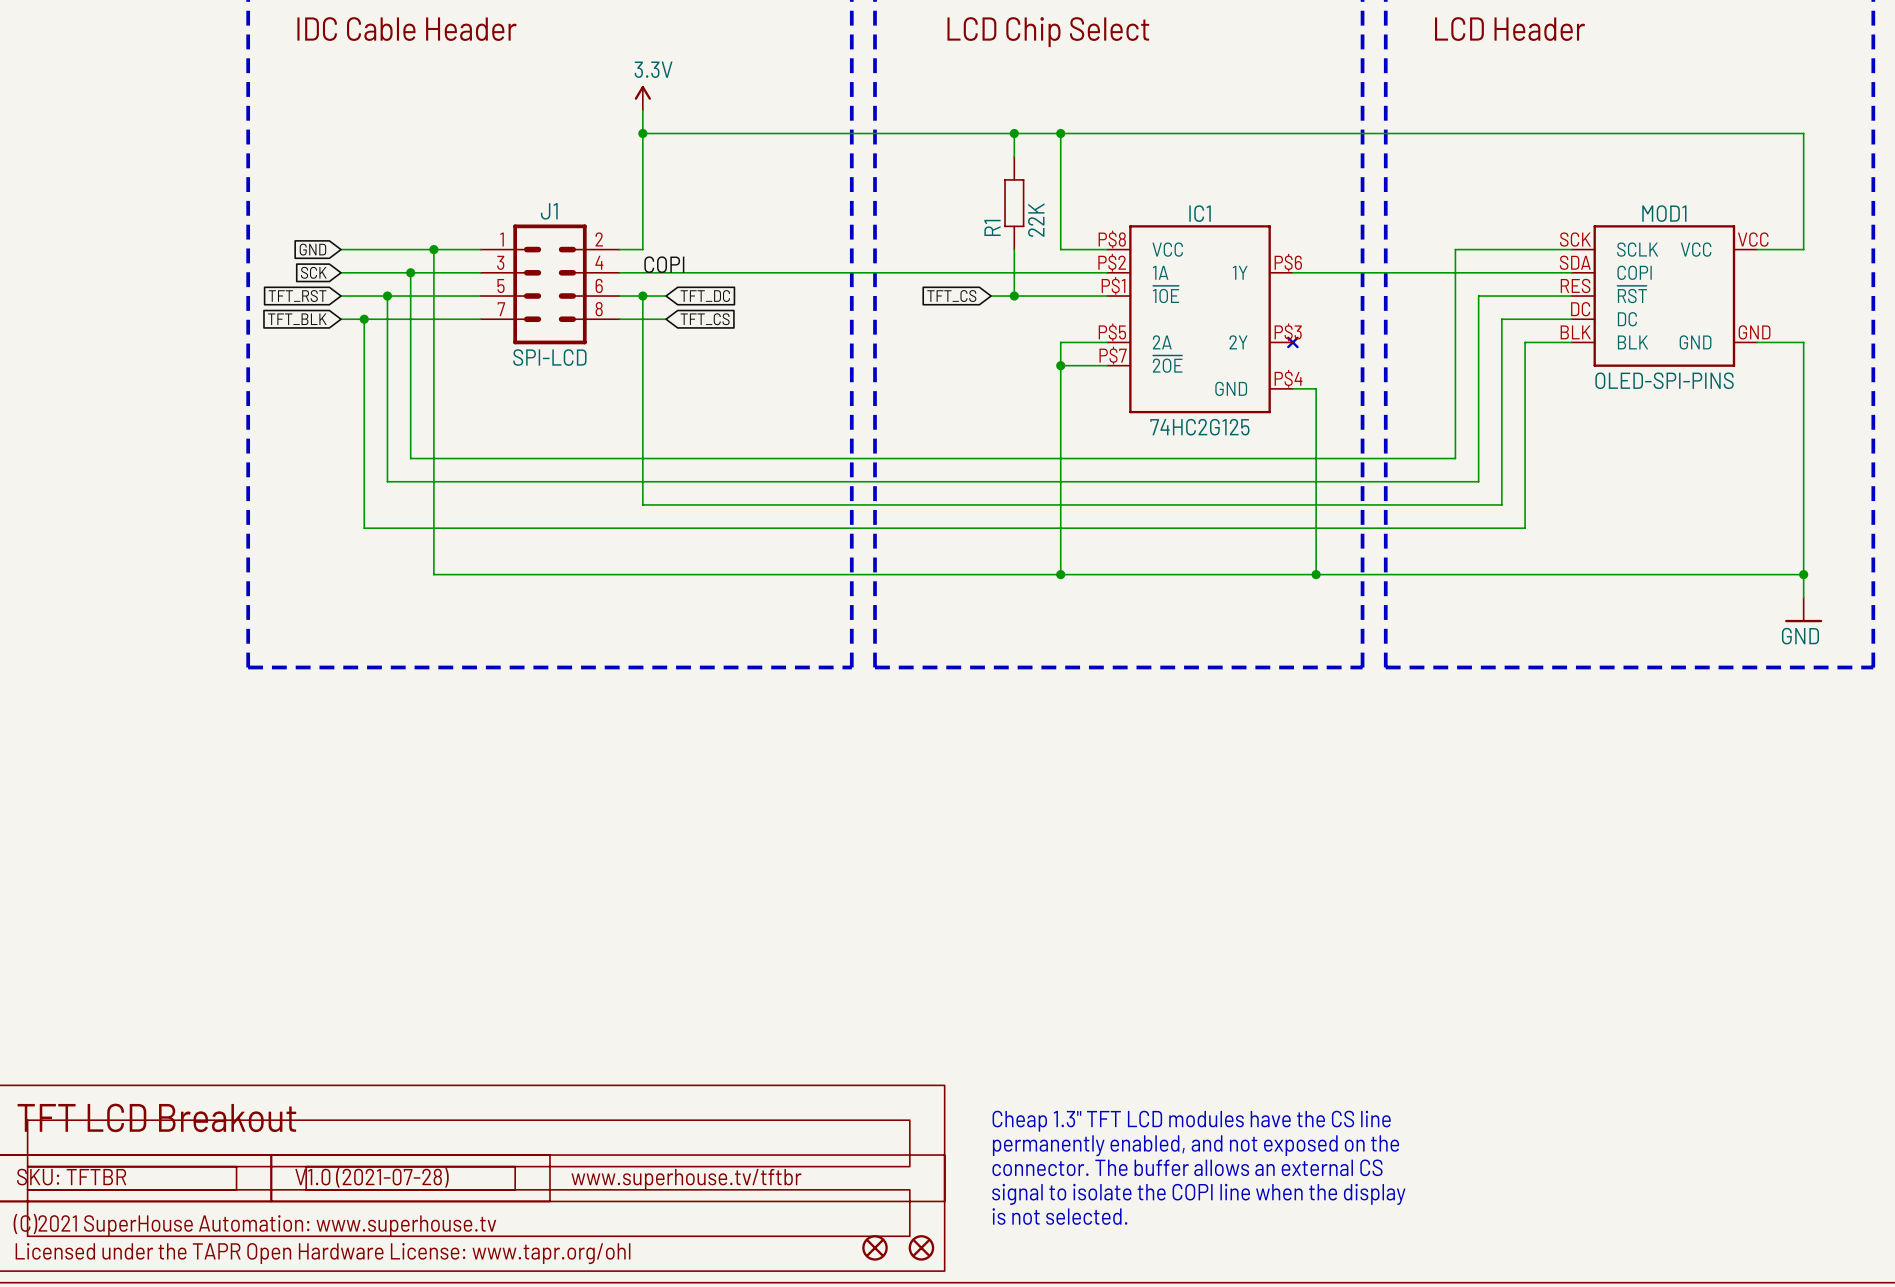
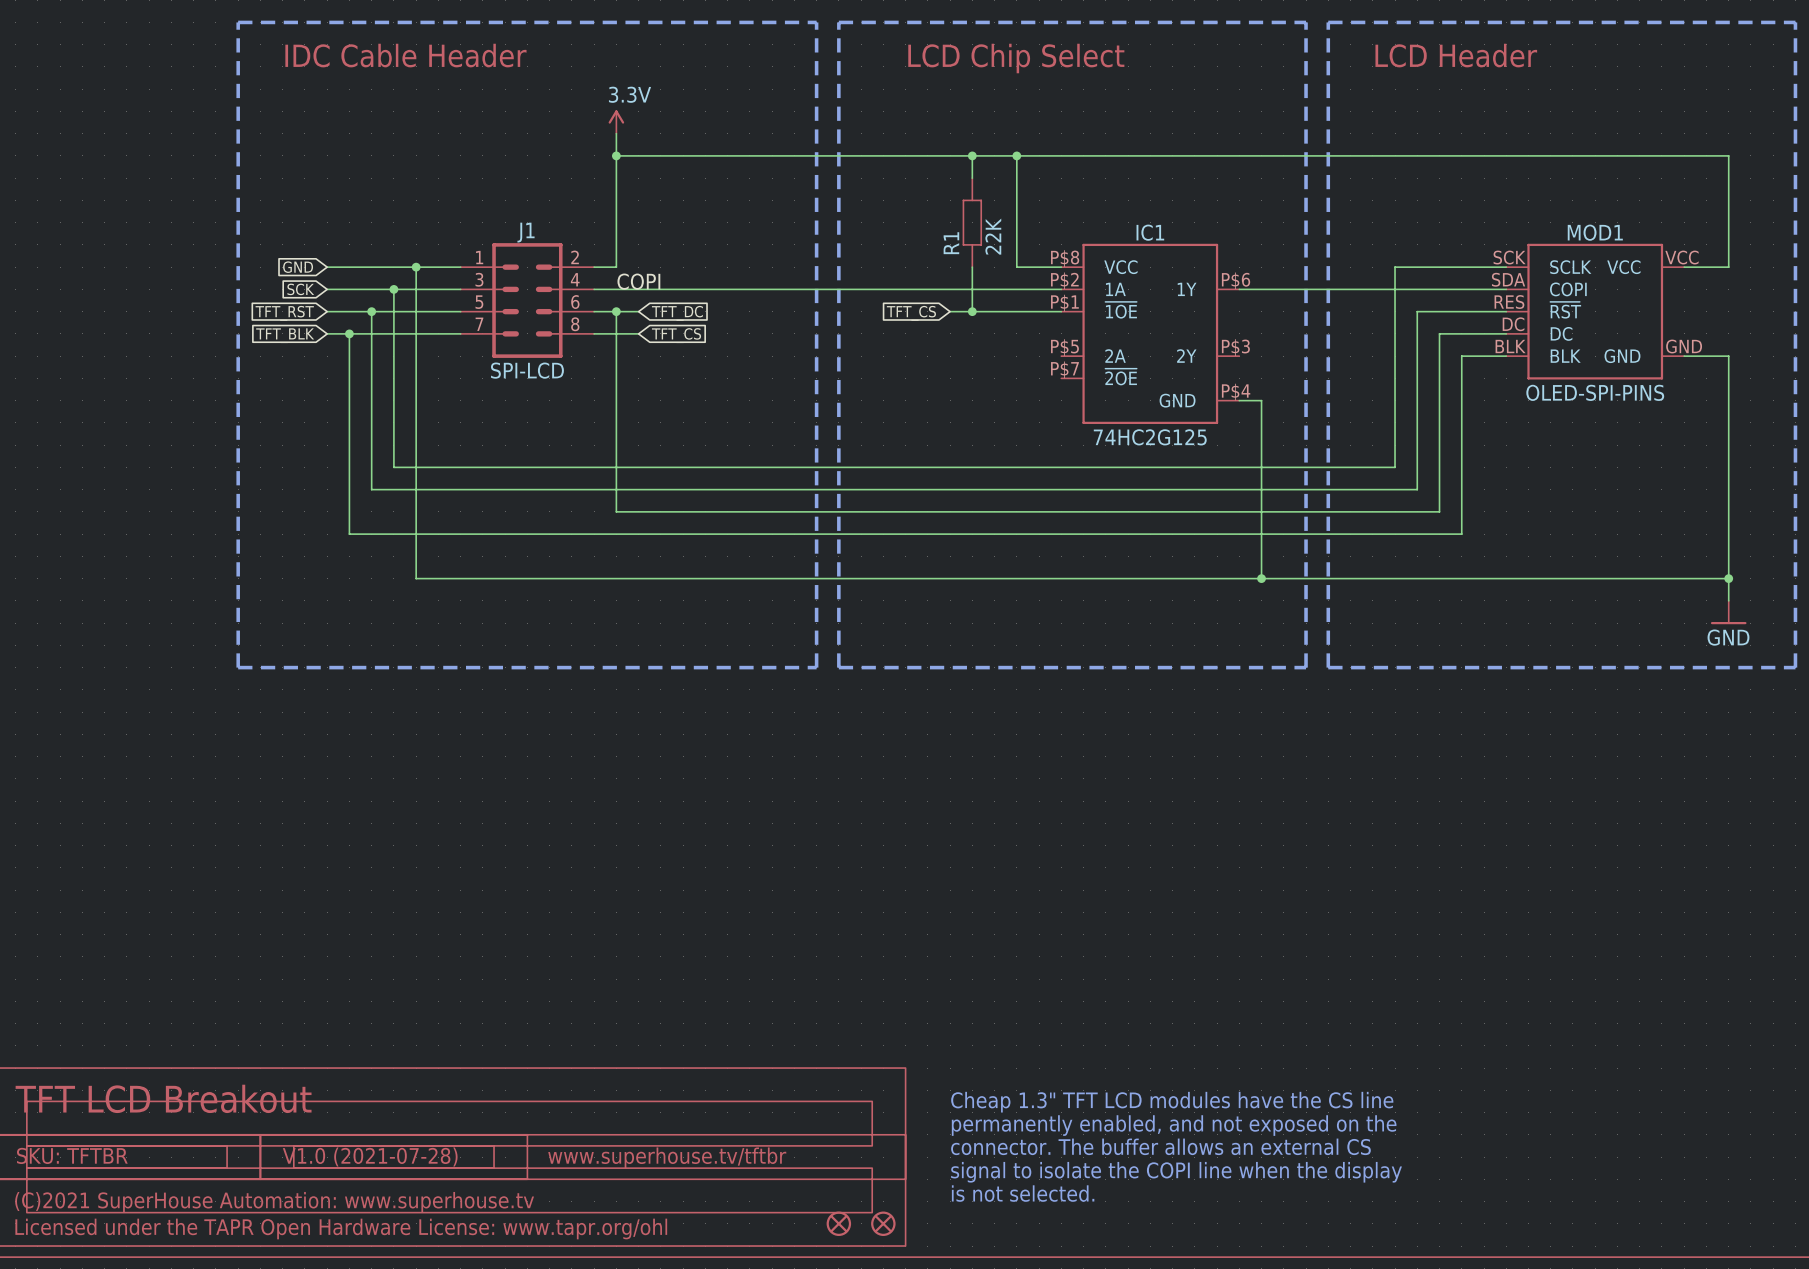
wire: (1107, 342) (1060, 342) (1060, 574) -> none
part: (1292, 342) -> none
wire: (1060, 365) (1107, 365) -> none
junction: (1060, 365) -> none
junction: (1060, 574) -> none

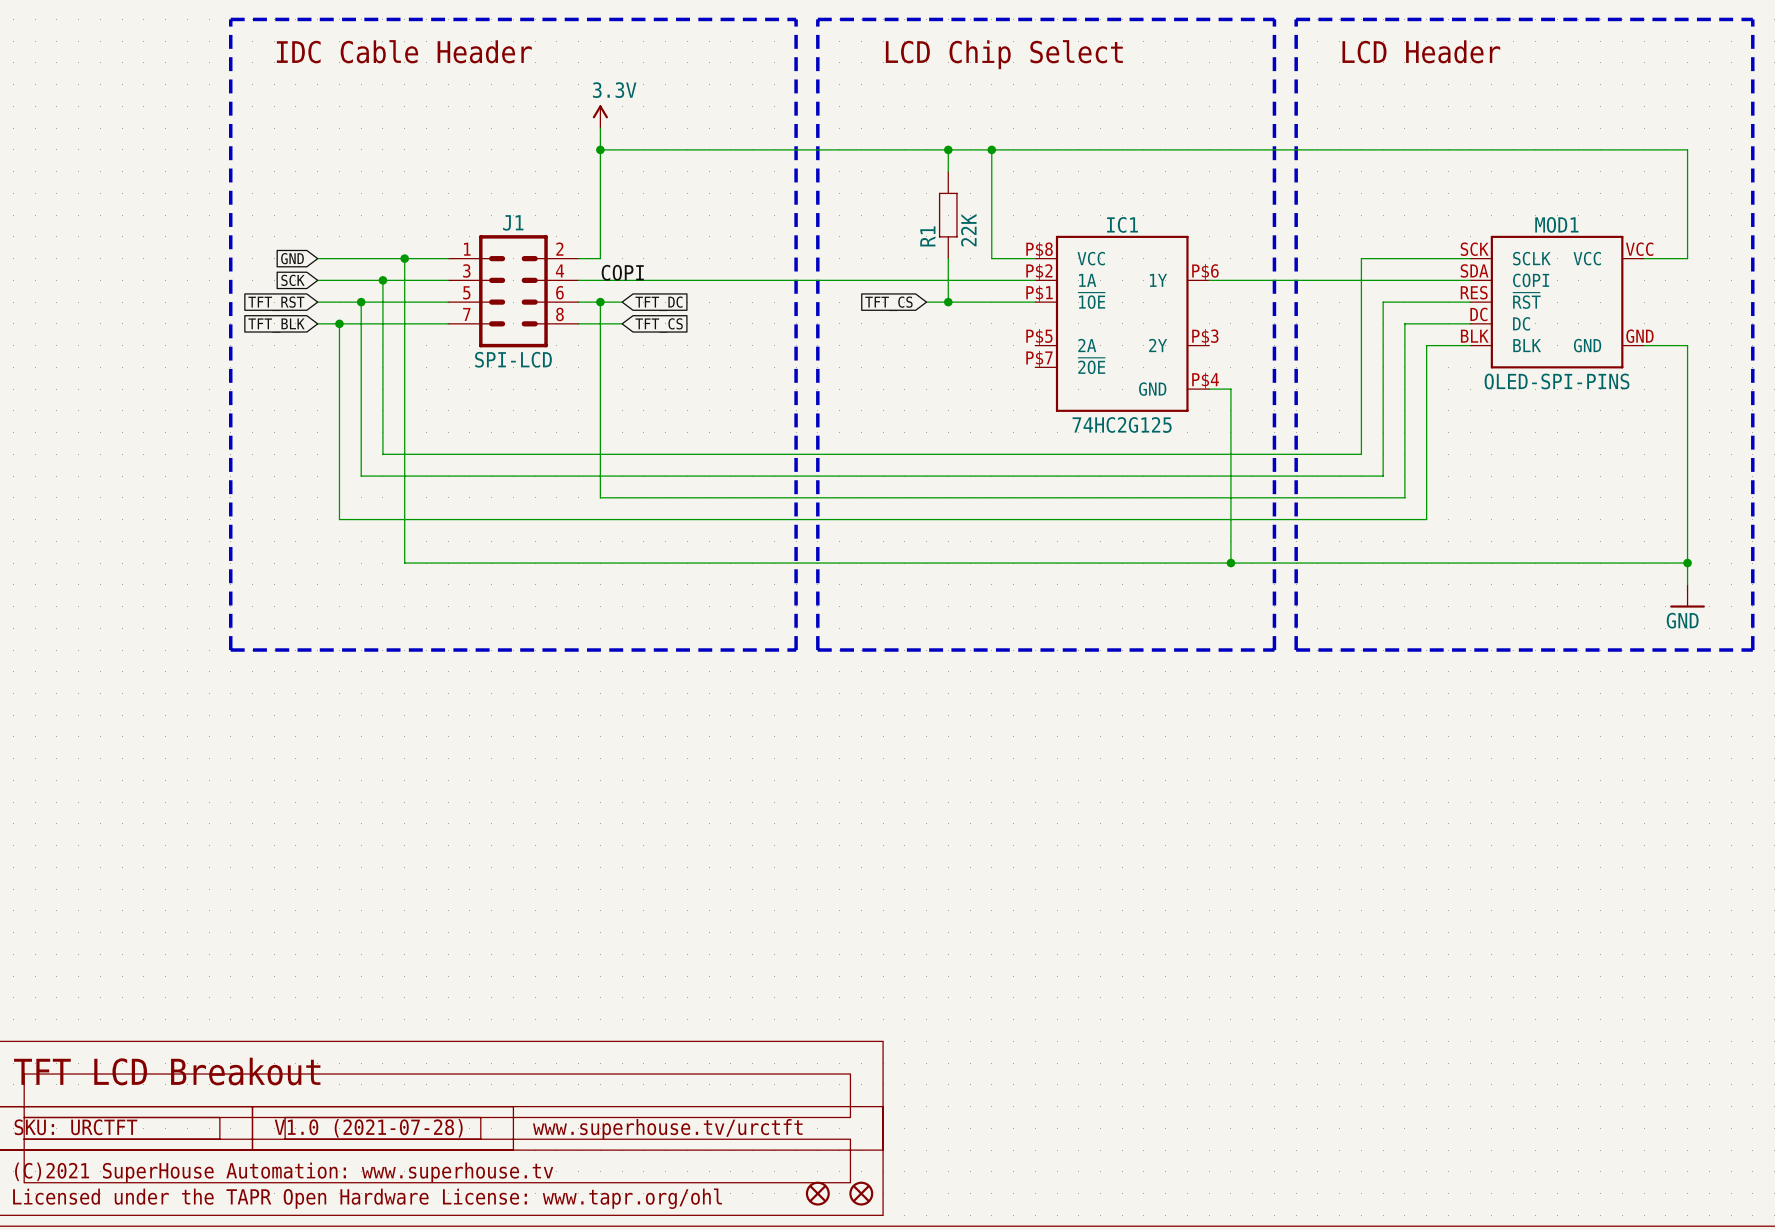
text: Cheap 1.3" TFT LCD modules have the CS line (1172, 1102) -> none
text: permanently enabled, and not exposed on the (1174, 1125) -> none
text: connector. The buffer allows an external CS (1160, 1146) -> none
text: SKU: TFTBR (72, 1155) -> SKU: URCTFT (75, 1127)
text: www.superhouse.tv/tftbr (667, 1157) -> www.superhouse.tv/urctft (667, 1129)
text: signal to isolate the COPI line when the display (1176, 1172) -> none
text: is not selected. (1023, 1193) -> none

